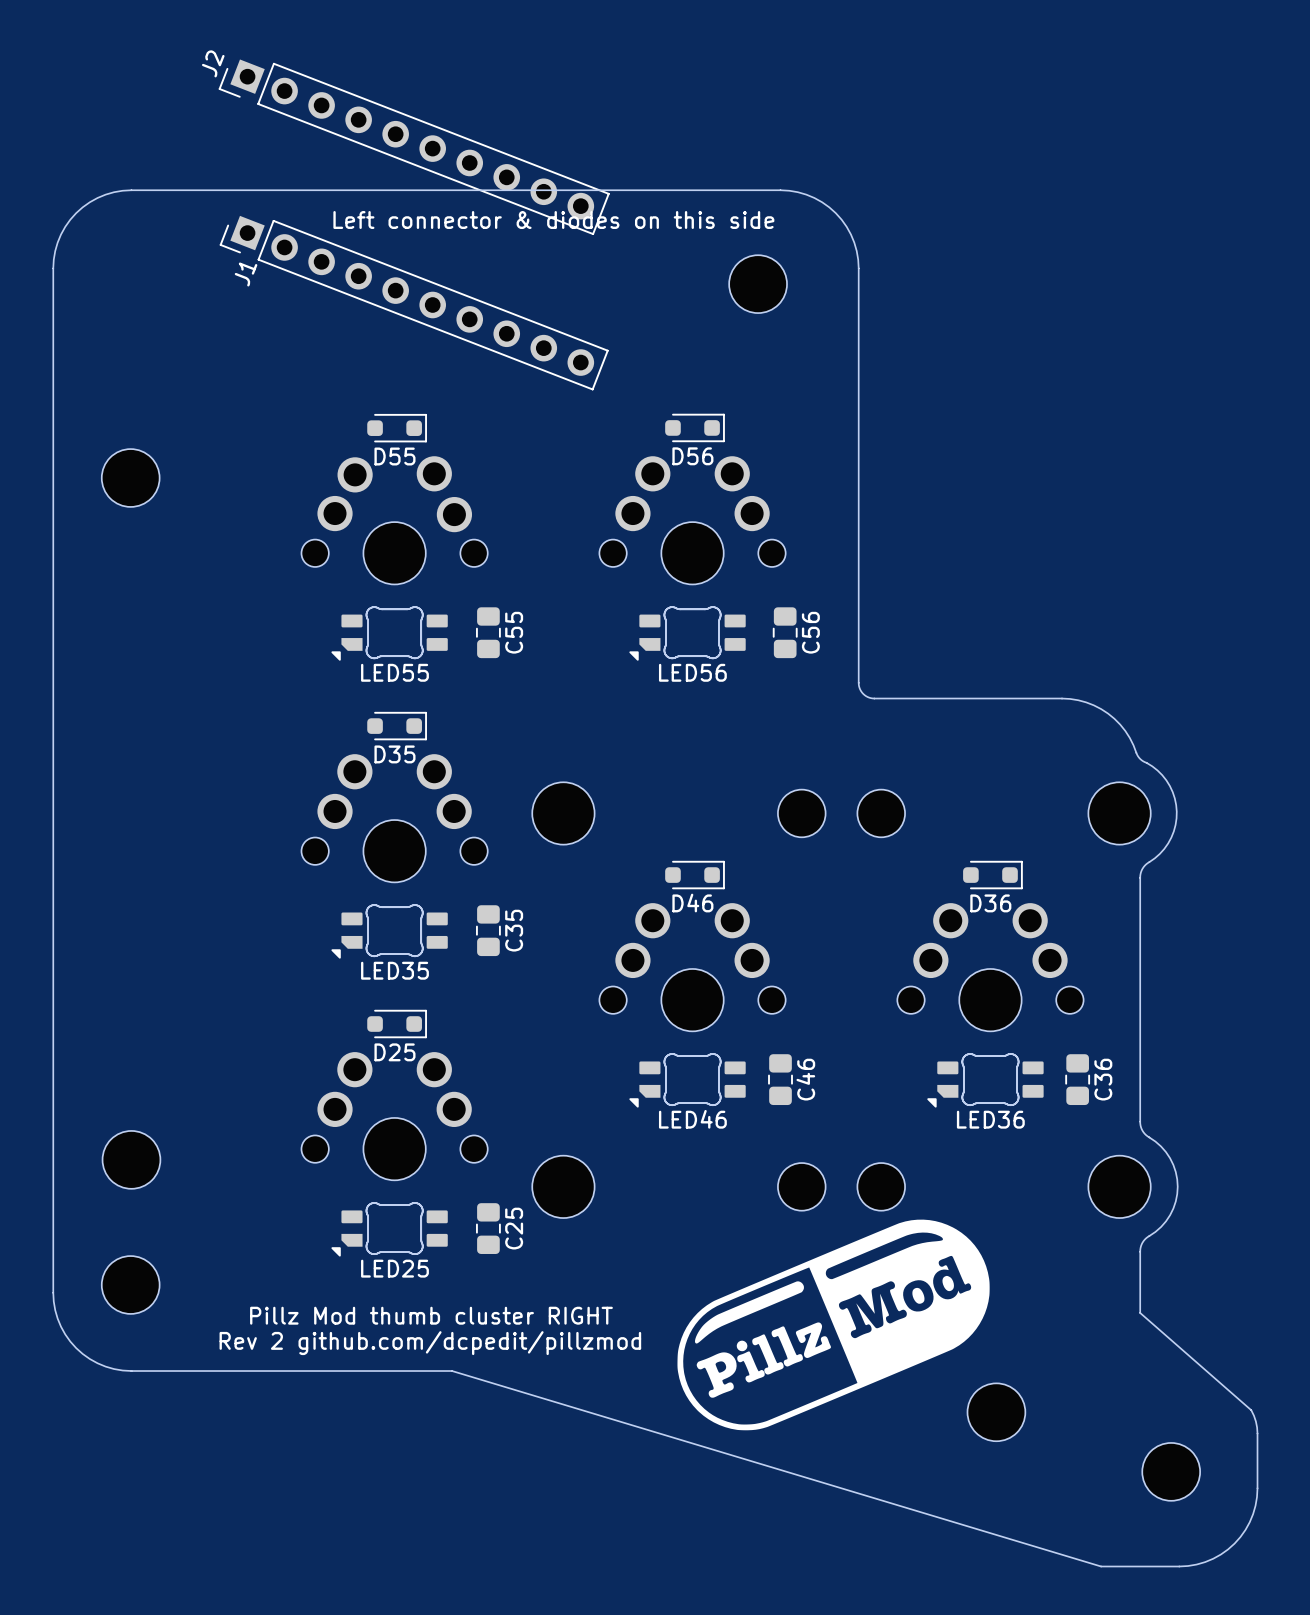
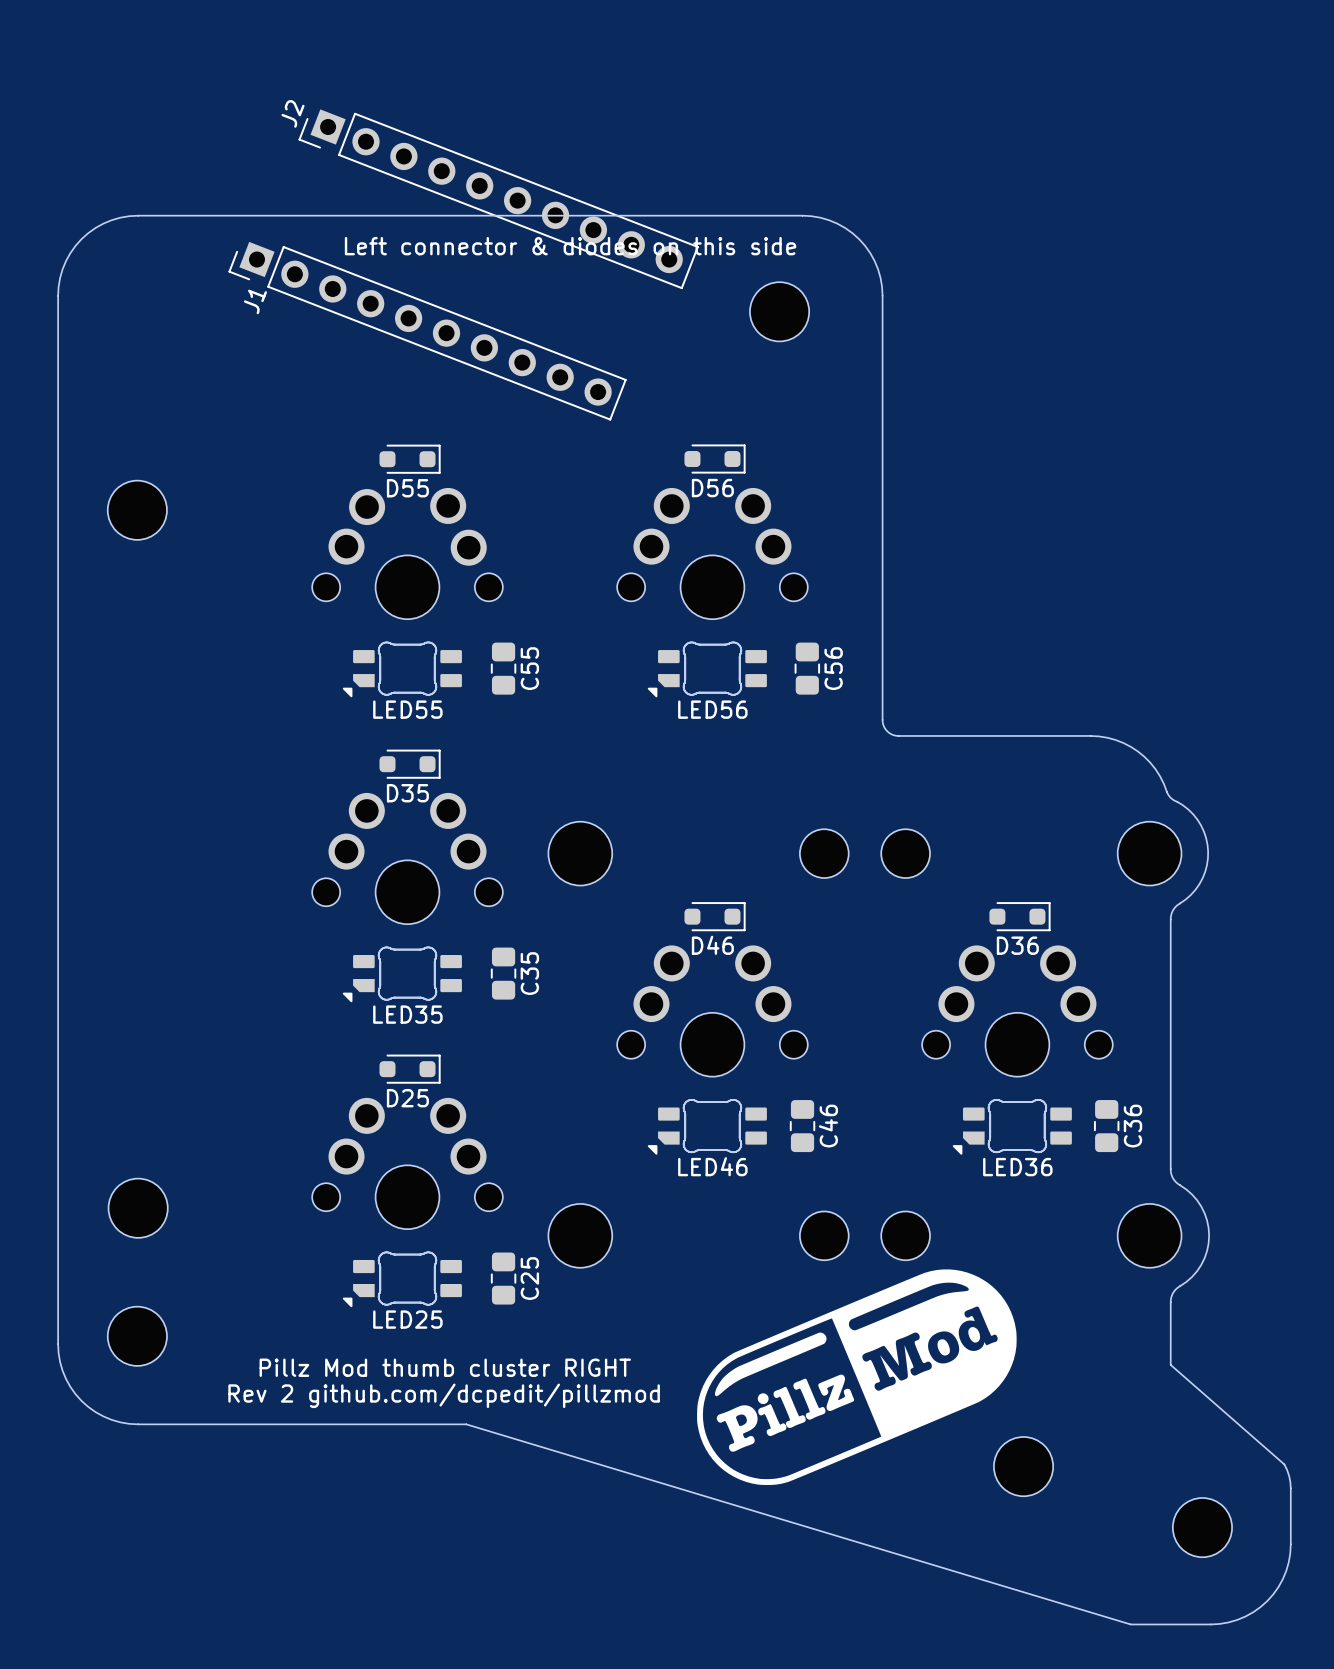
J2 position: (414, 147) -> (498, 199)

